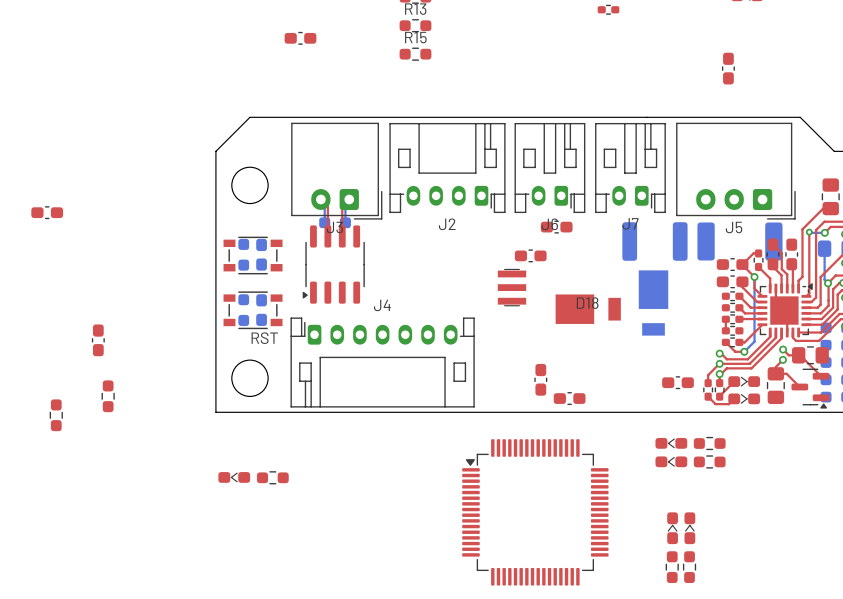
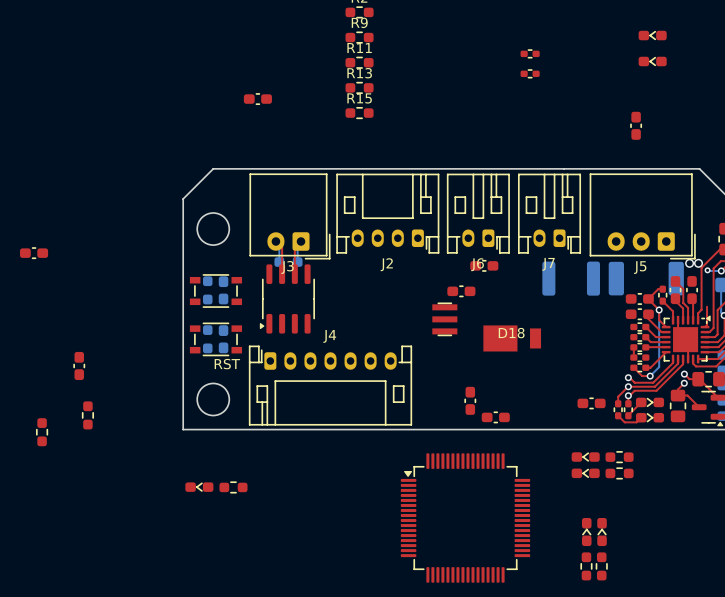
via: none -> (689, 263)
via: none -> (698, 263)
top track: (809, 232) (808, 294) -> (707, 306) (707, 325)
part: (653, 303) -> none

